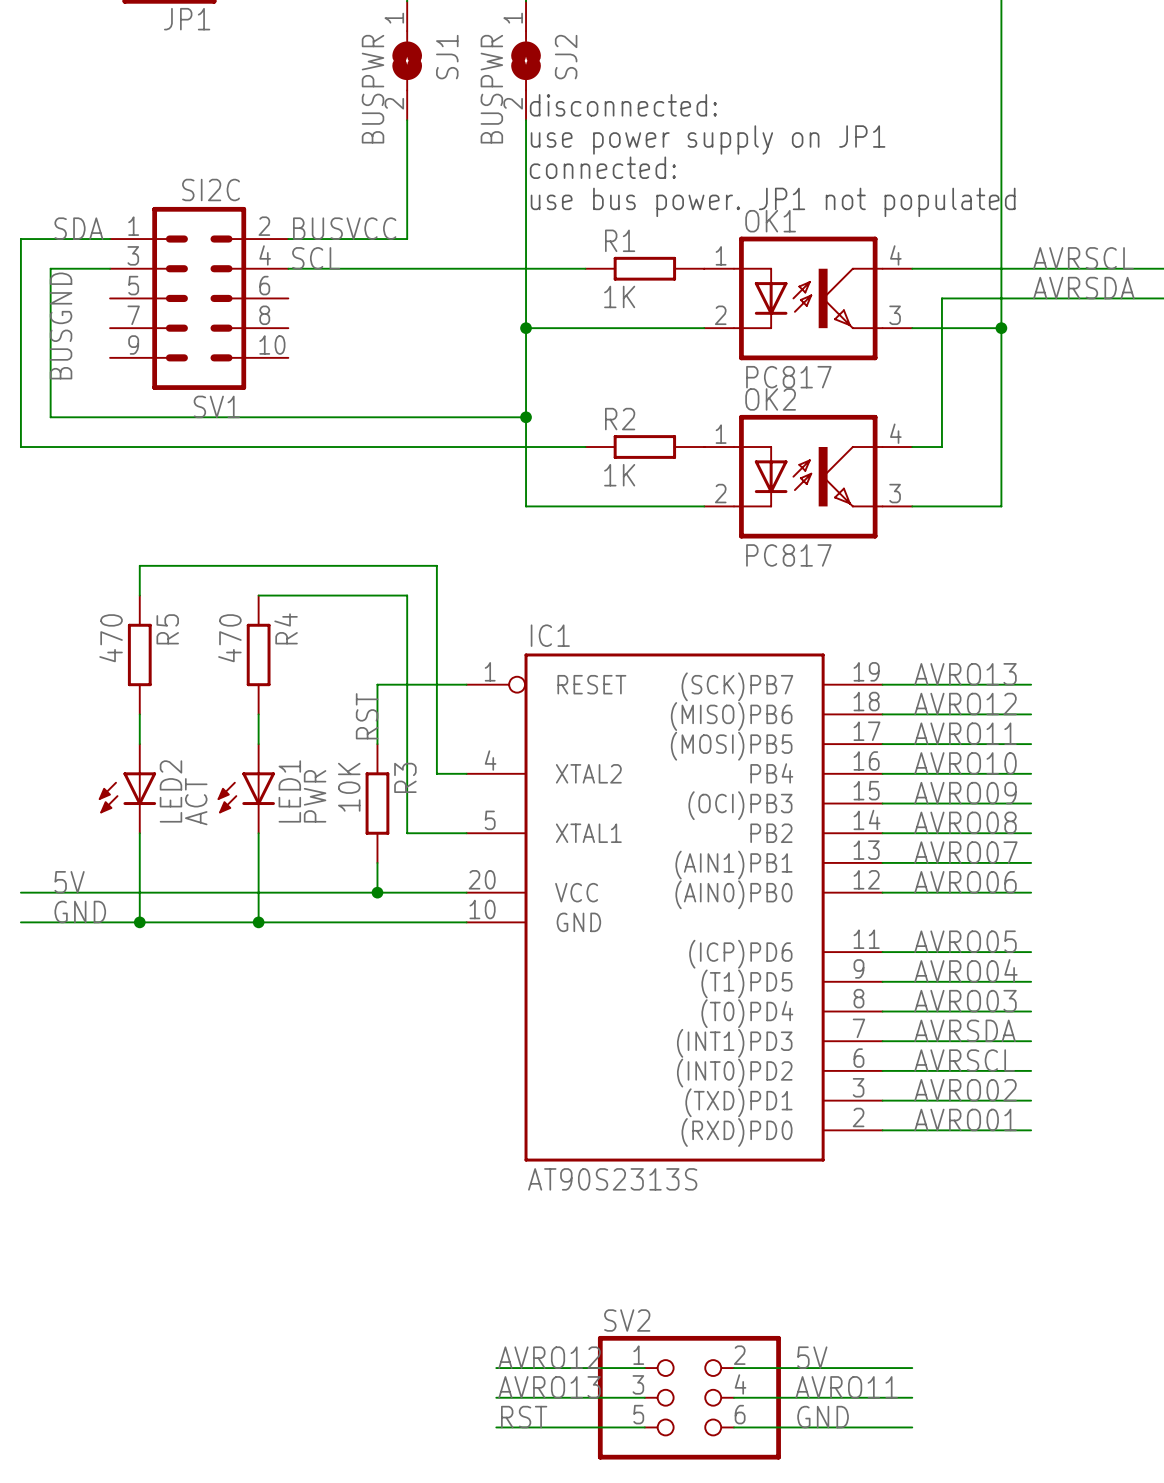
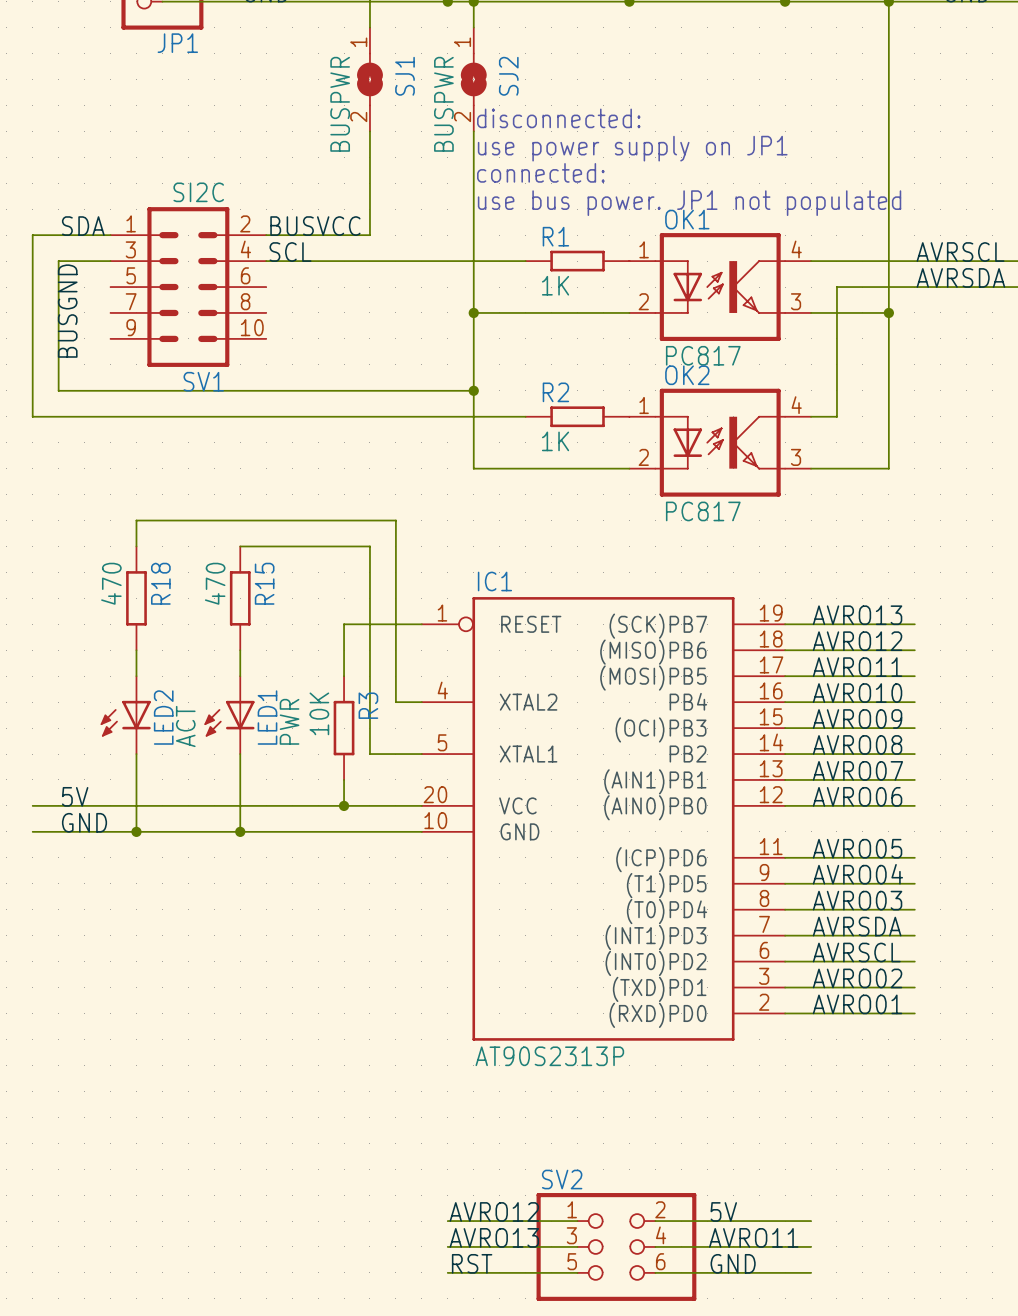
R4 name: R4 (286, 628) -> R15 (264, 583)
R5 name: R5 (167, 629) -> R18 (160, 583)
label: RST (367, 716) -> none
IC1 value: AT90S2313S (612, 1179) -> AT90S2313P (549, 1056)

